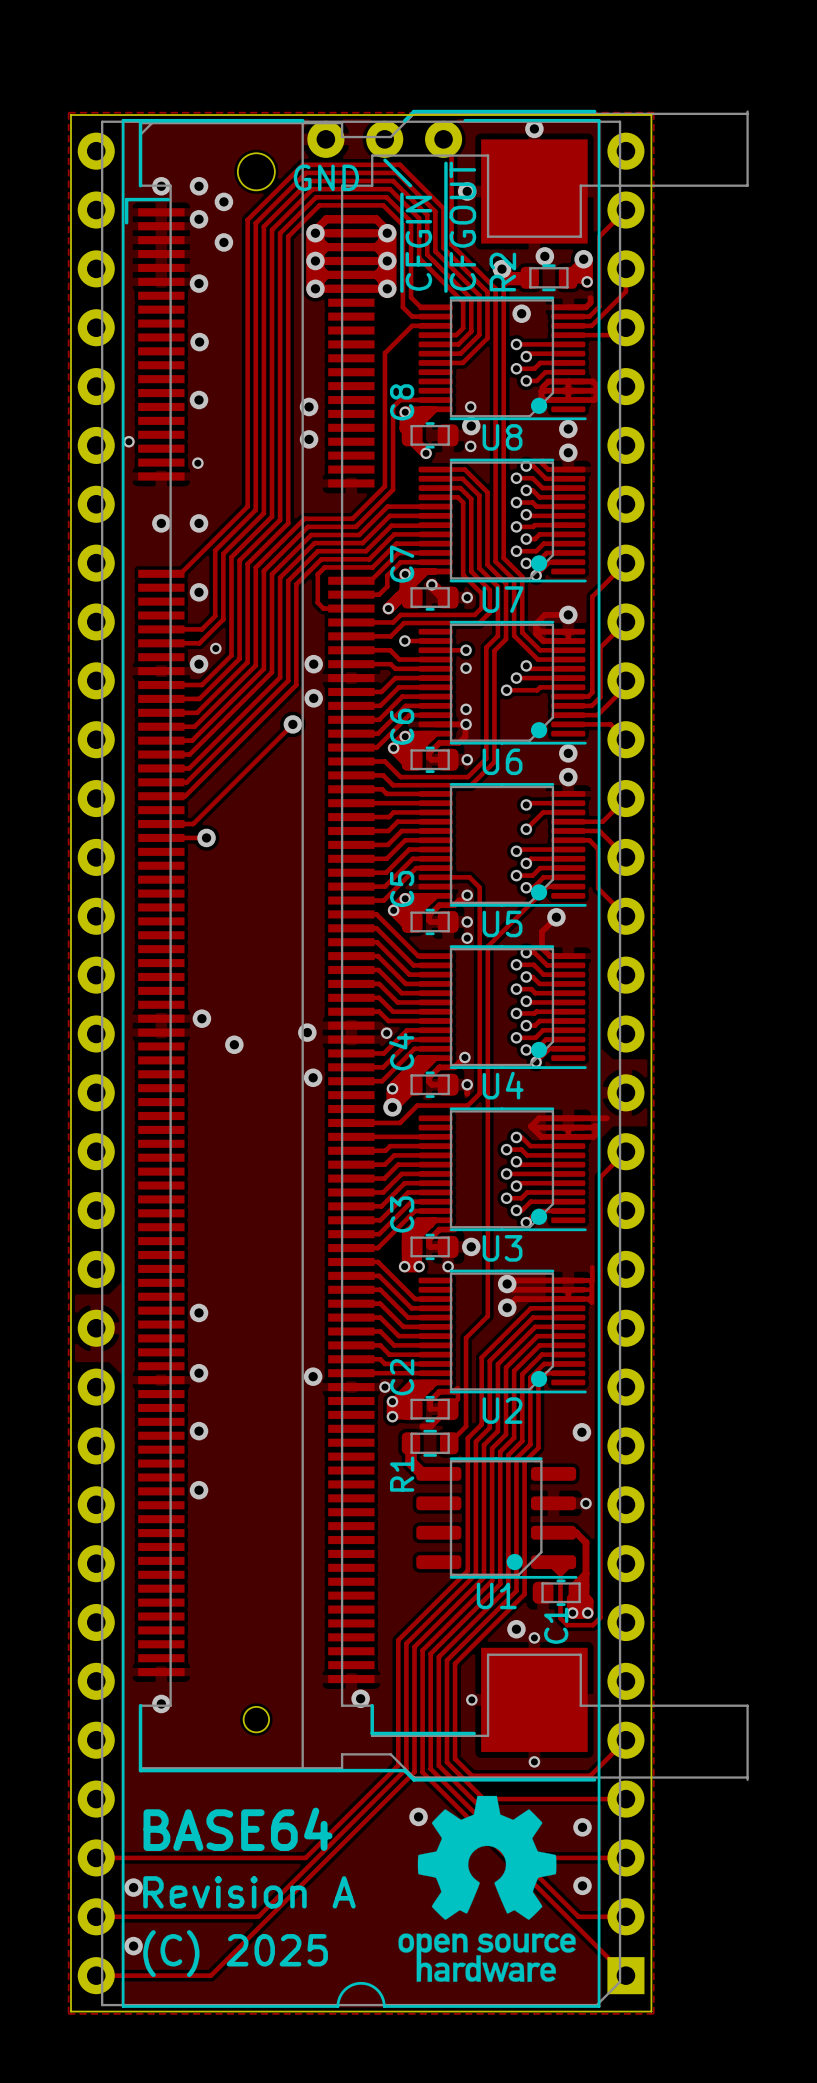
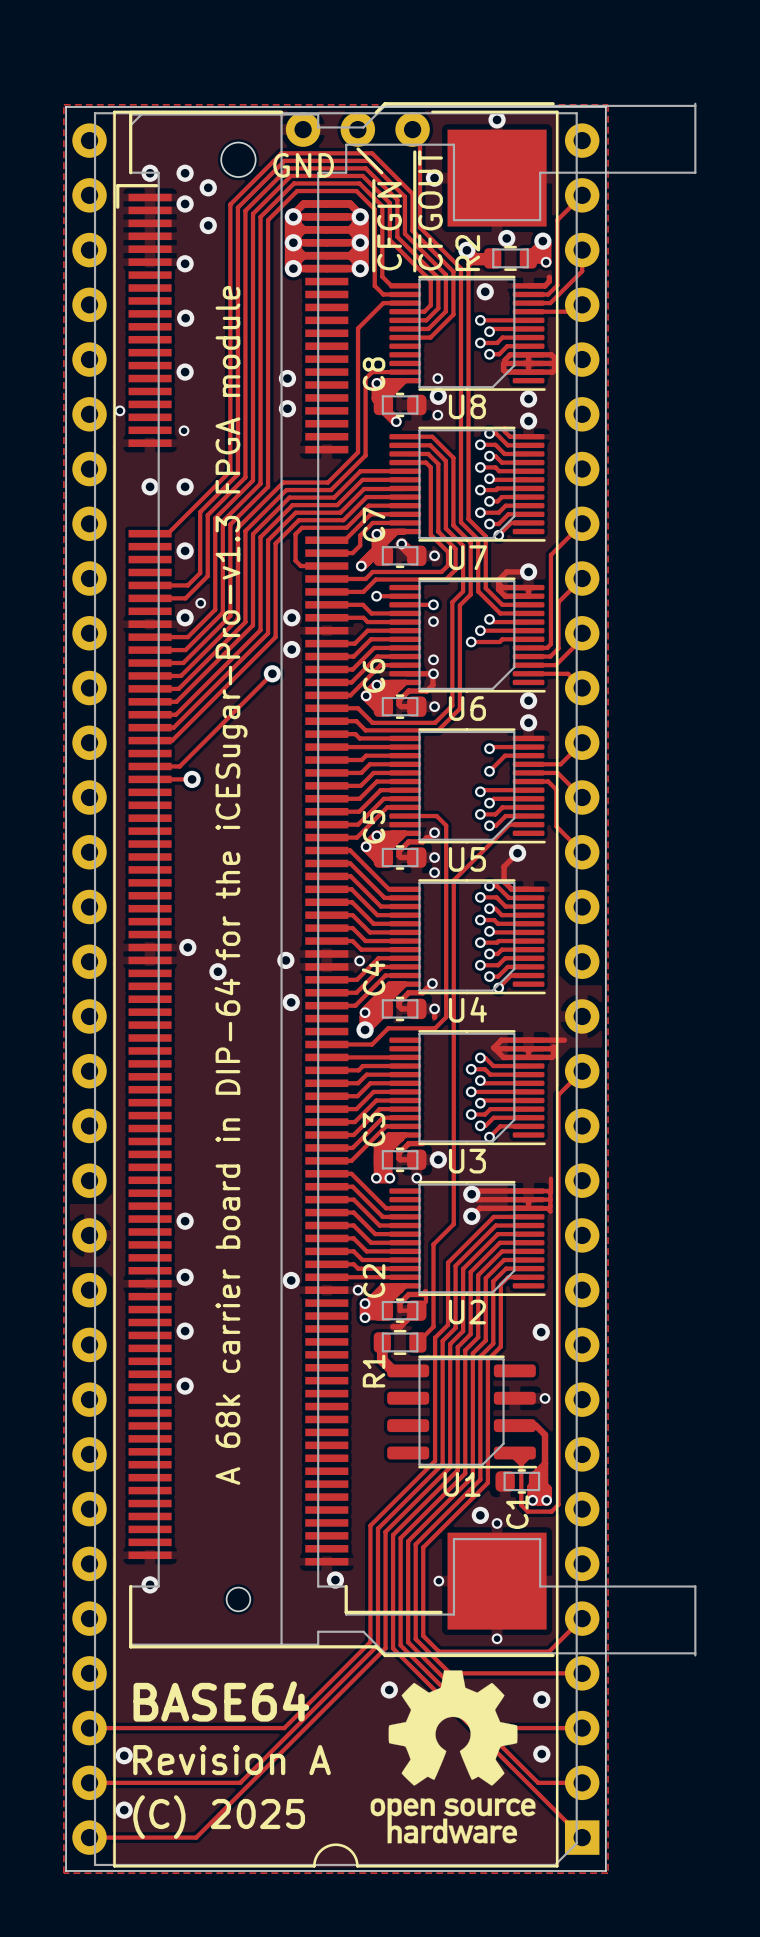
U8 footprint: [418, 296, 587, 421] -> [389, 275, 546, 391]
U7 footprint: [418, 458, 587, 583] -> [389, 426, 546, 542]
U6 footprint: [418, 620, 587, 745] -> [389, 577, 546, 693]
U5 footprint: [418, 783, 587, 907] -> [389, 728, 546, 844]
U4 footprint: [418, 945, 587, 1069] -> [389, 879, 546, 995]
text: none -> A 68k carrier board in DIP-64 for the iCESugar-Pro-v1.3 FPGA module (231, 885)
U3 footprint: [418, 1107, 587, 1232] -> [389, 1030, 546, 1146]
U2 footprint: [418, 1269, 587, 1394] -> [389, 1180, 546, 1296]
U1 footprint: [416, 1457, 578, 1579] -> [387, 1355, 538, 1469]

